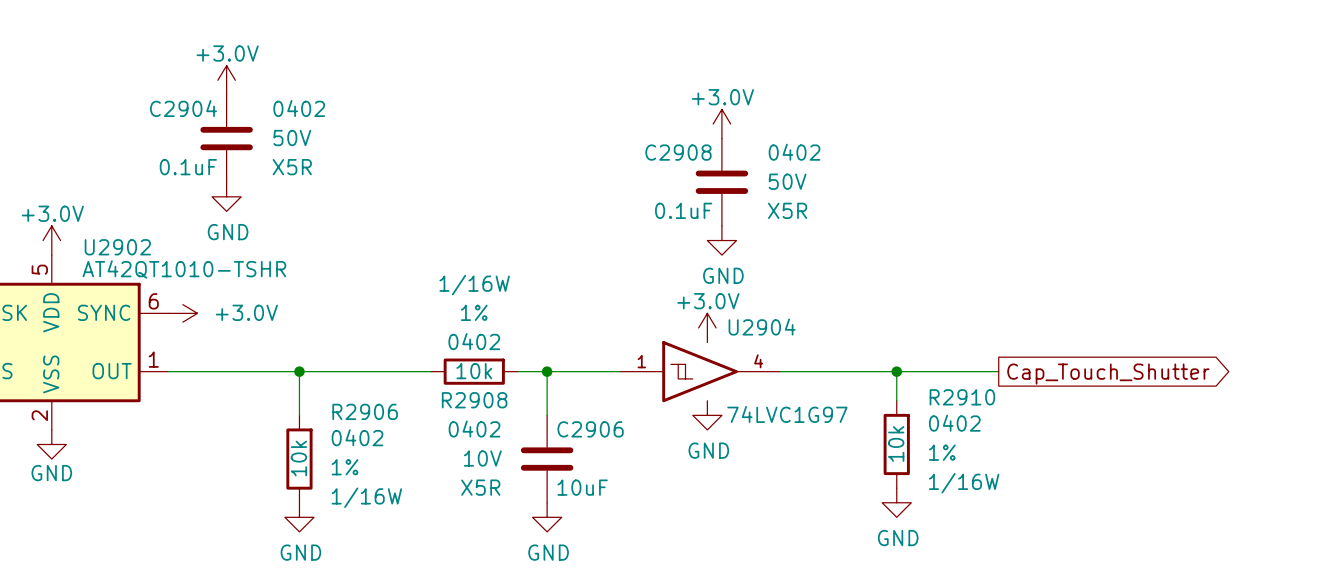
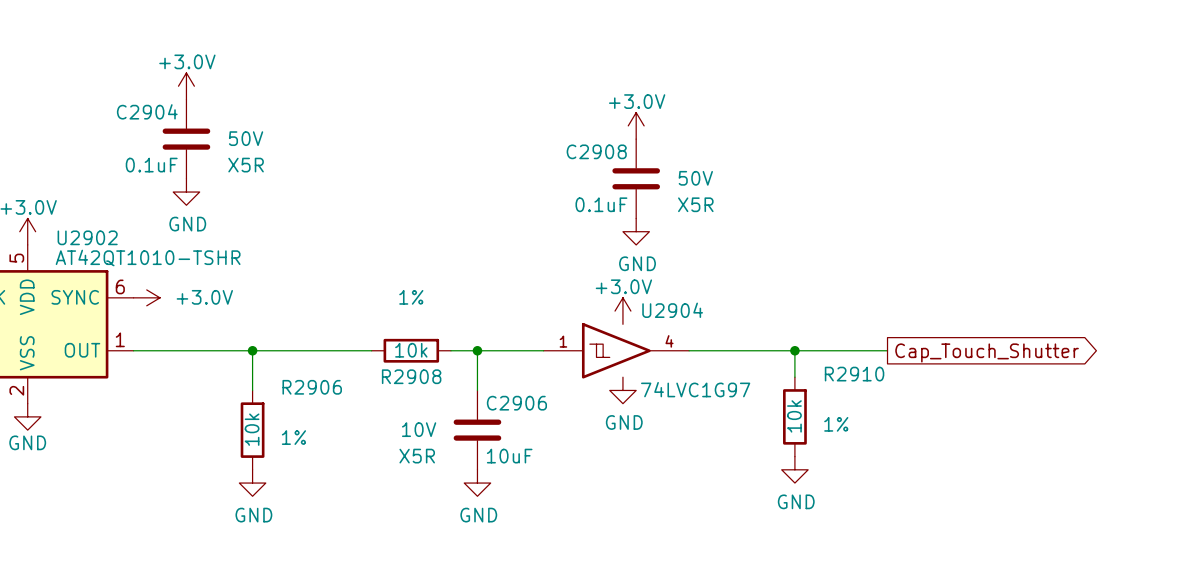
C2904 text: 0402 (299, 108) -> none
C2908 text: 0402 (794, 152) -> none
R2908 text: 1/16W (474, 285) -> none
R2908 text: 0402 (474, 341) -> none
R2910 text: 0402 (954, 423) -> none
C2906 text: 0402 (474, 429) -> none
R2906 text: 0402 (357, 437) -> none
R2910 text: 1/16W (964, 483) -> none
R2906 text: 1/16W (366, 497) -> none

